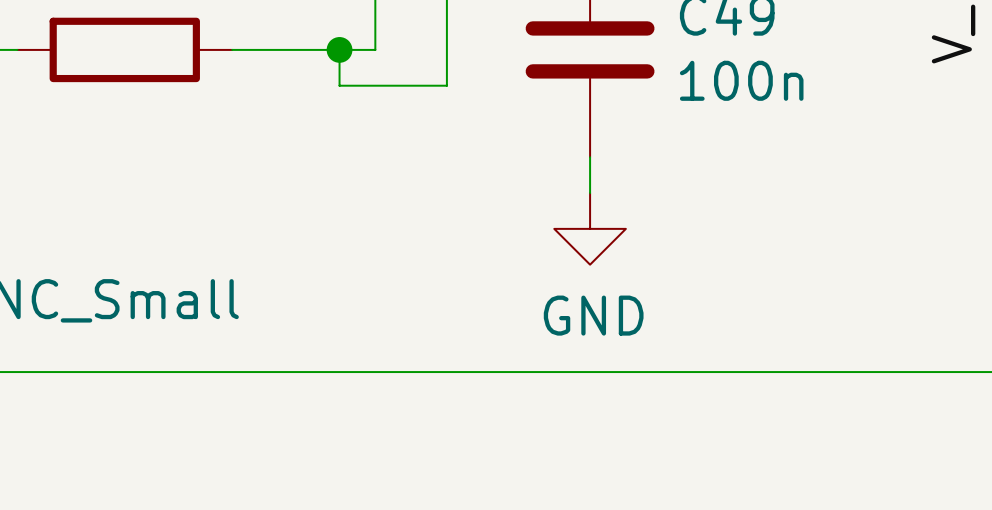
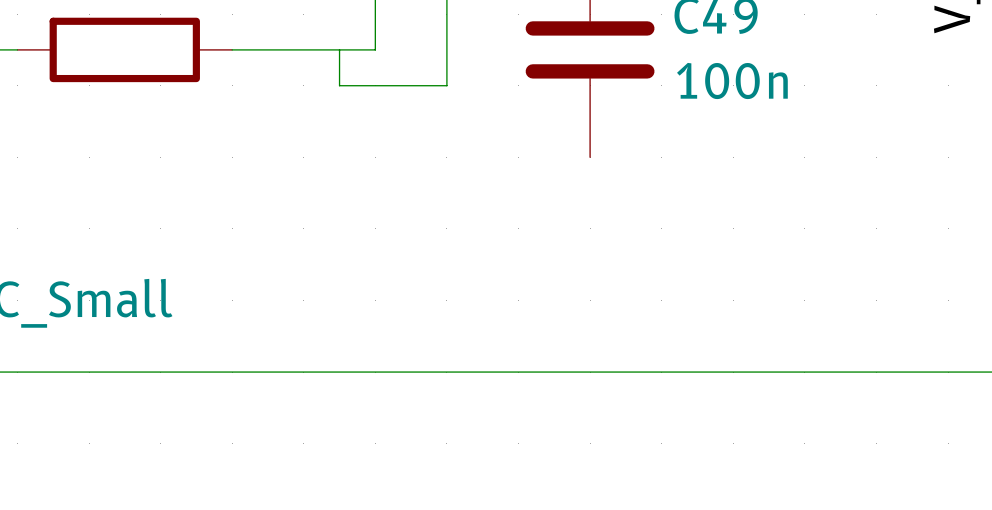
junction: (339, 49) -> none
wire: (590, 157) (590, 193) -> none
power symbol: GND (590, 228) -> none

